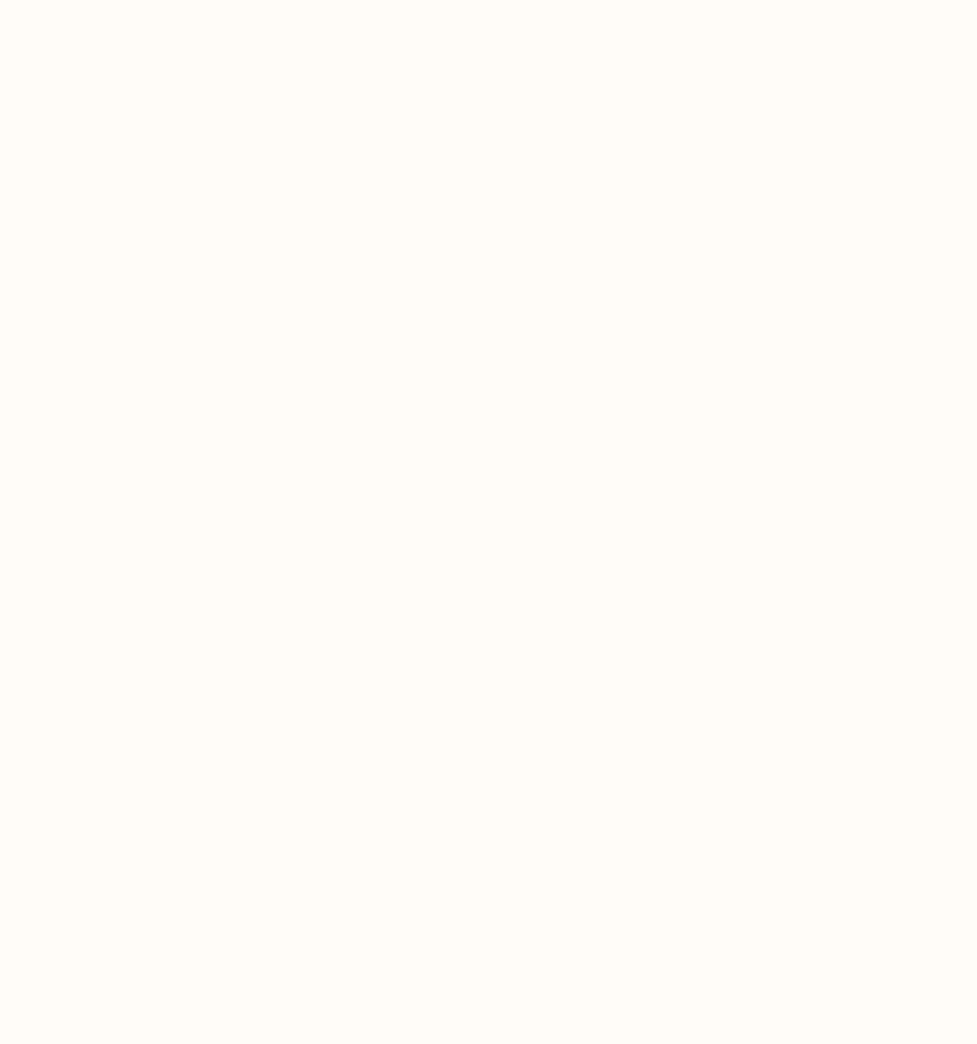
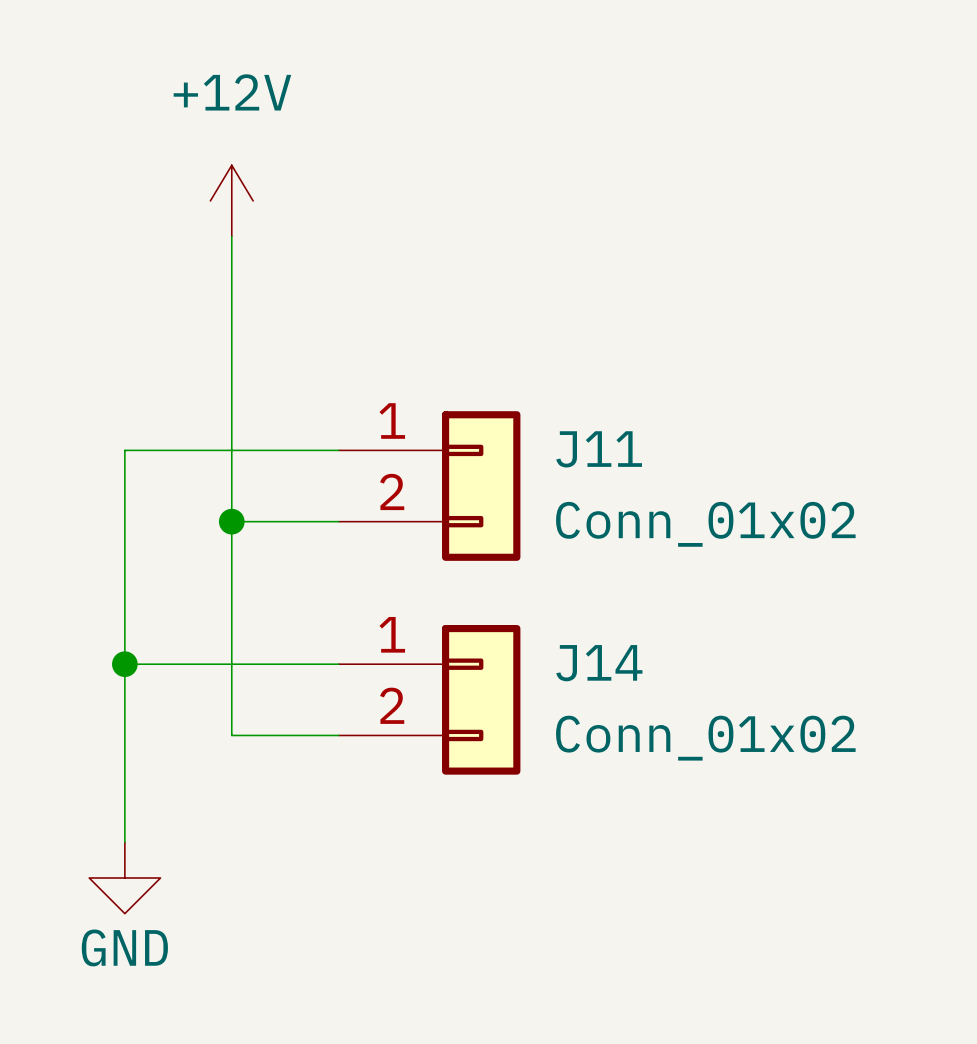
power symbol: none -> +12V (231, 200)
wire: none -> (231, 236) (231, 735) (338, 735)
wire: none -> (338, 450) (124, 450) (124, 842)
J11: none -> Conn_01x02 (429, 486)
wire: none -> (231, 521) (338, 521)
junction: none -> (231, 521)
wire: none -> (124, 664) (338, 664)
junction: none -> (124, 664)
J14: none -> Conn_01x02 (429, 699)
power symbol: none -> GND (124, 878)

